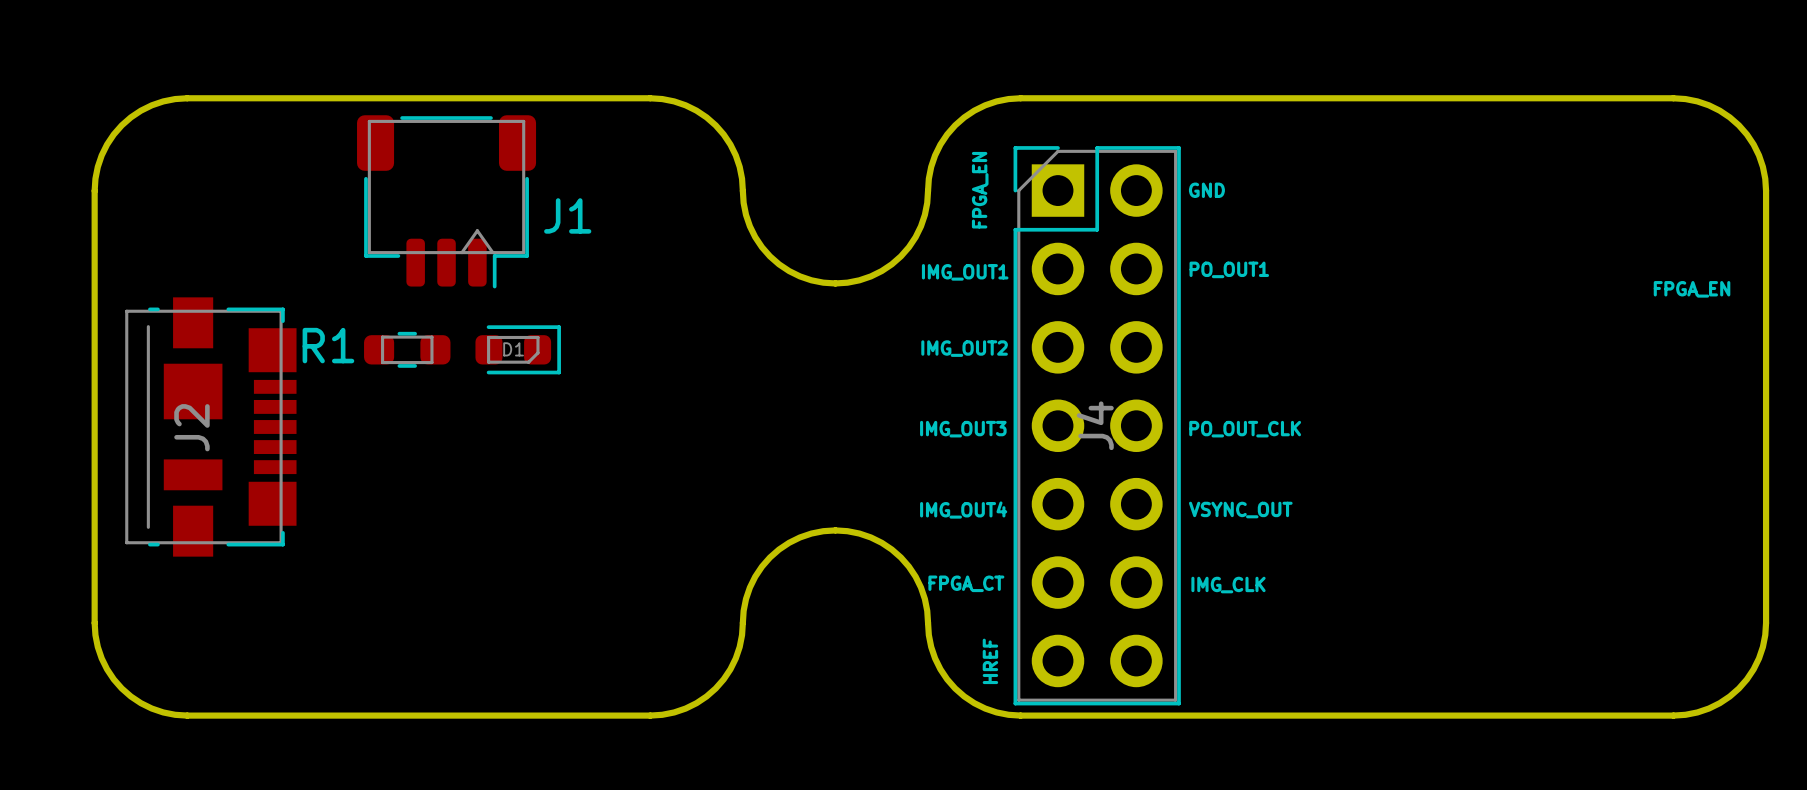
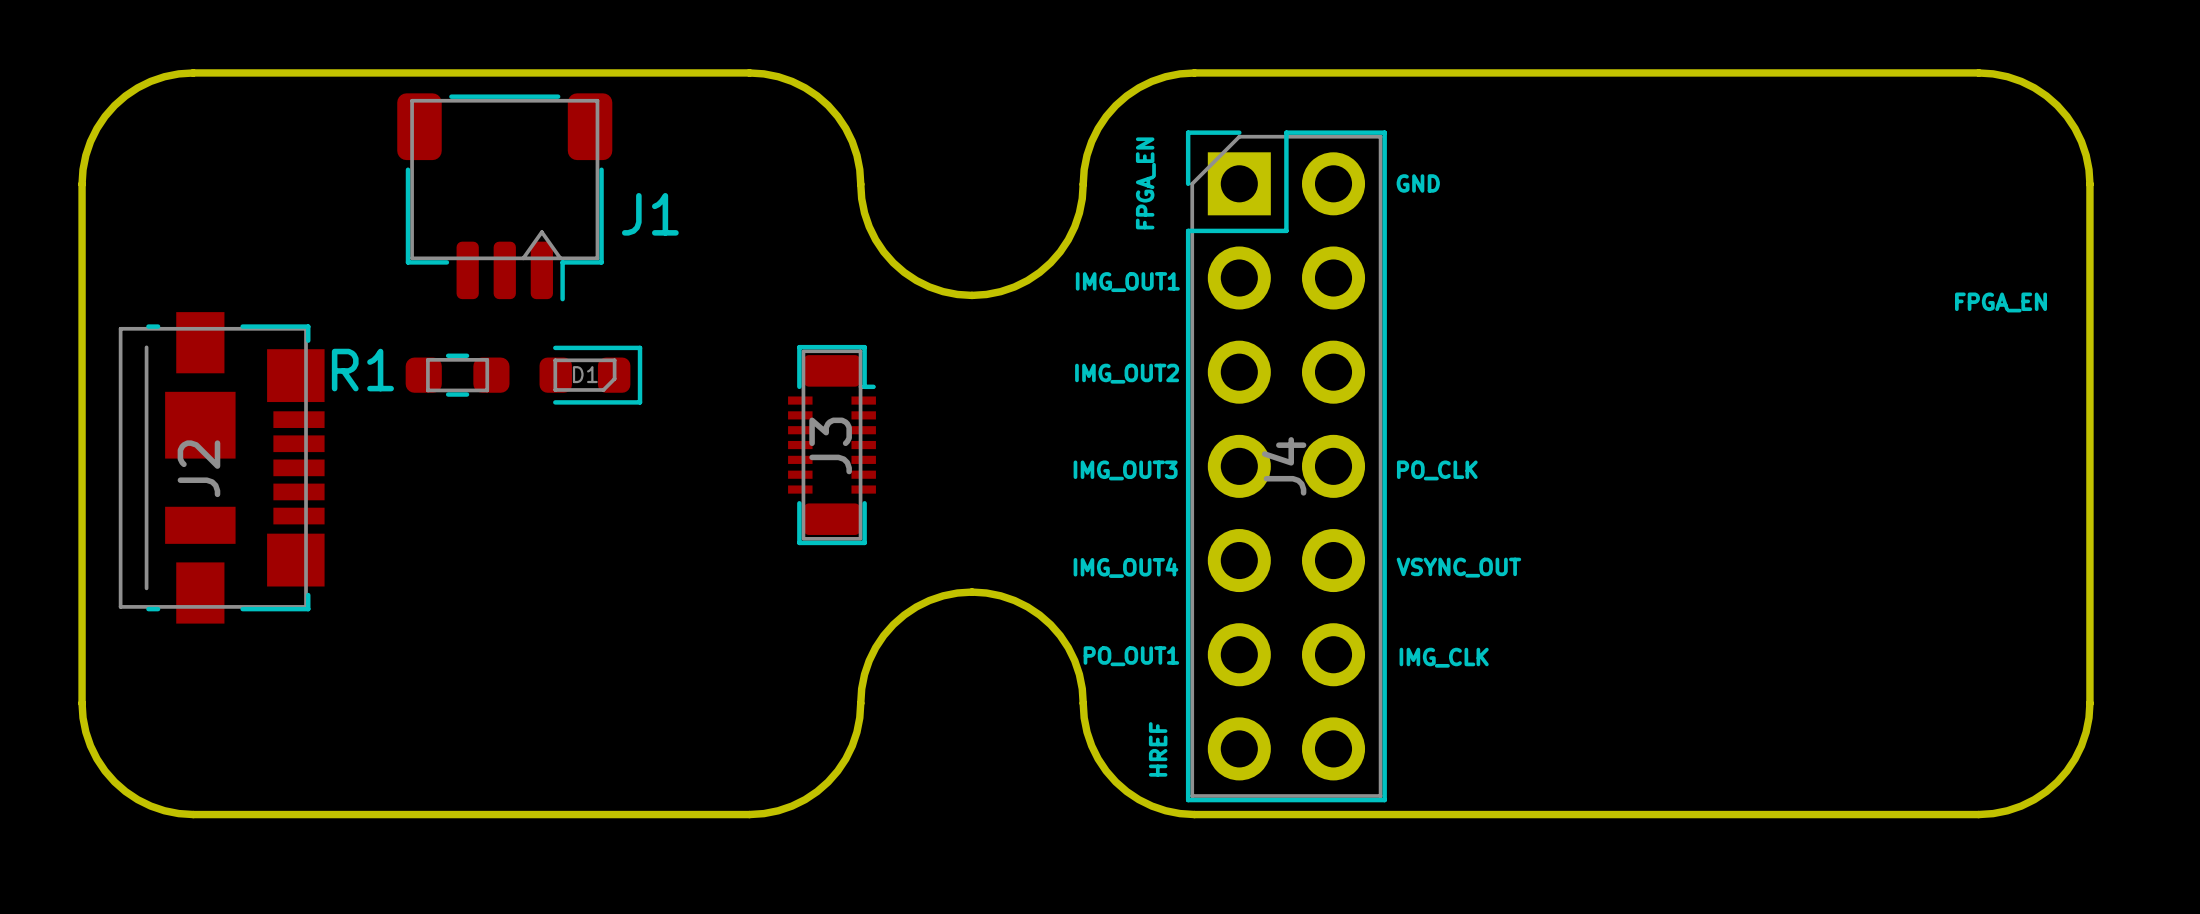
text: PO_OUT1 (1229, 269) -> none
J3: none -> (832, 445)
text: PO_OUT_CLK (1245, 429) -> PO_CLK (1437, 470)
text: FPGA_CT (966, 583) -> PO_OUT1 (1131, 656)

